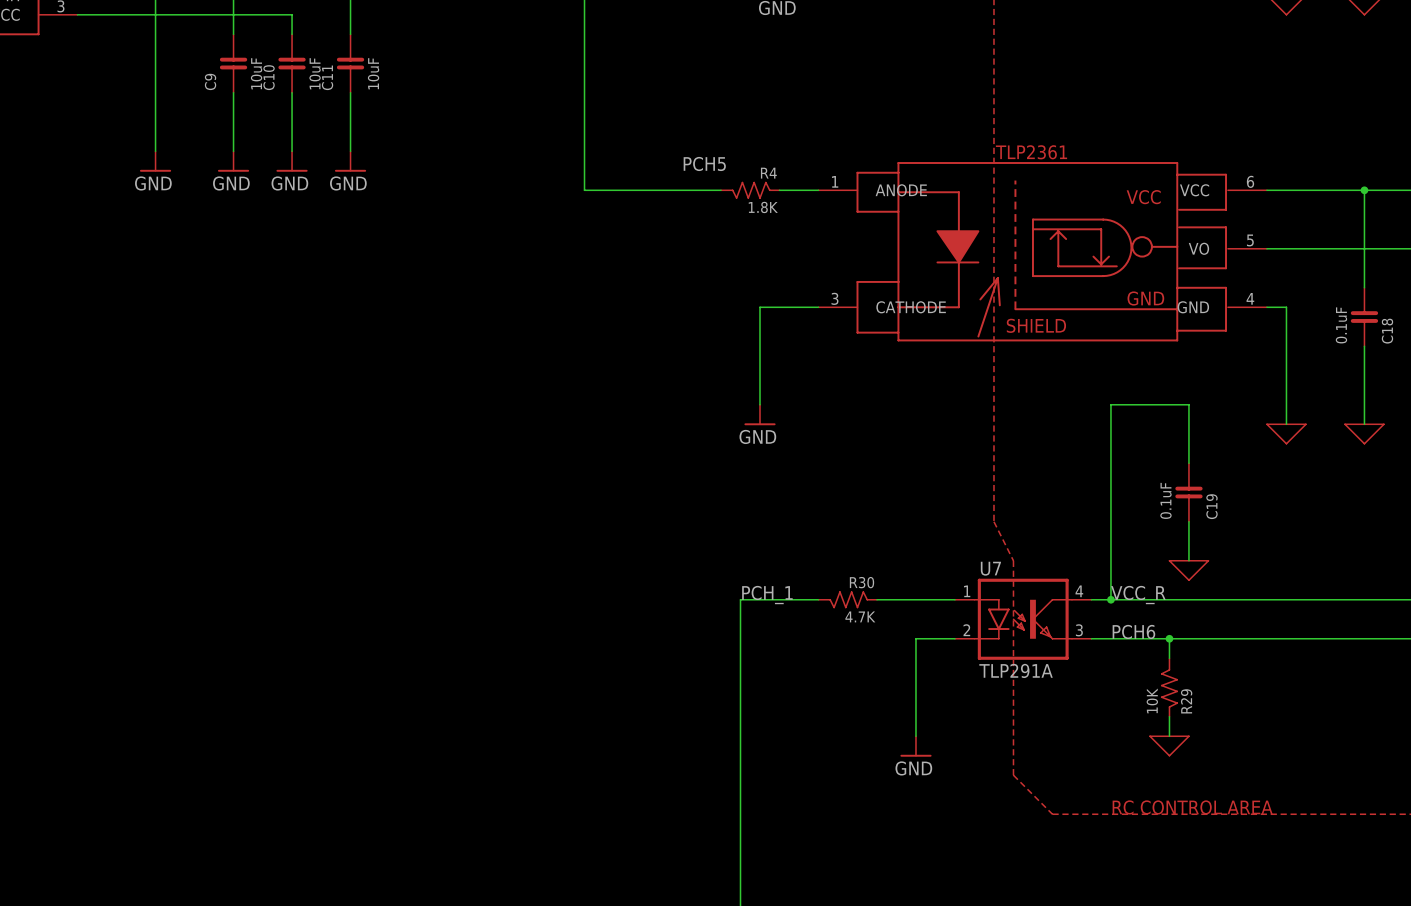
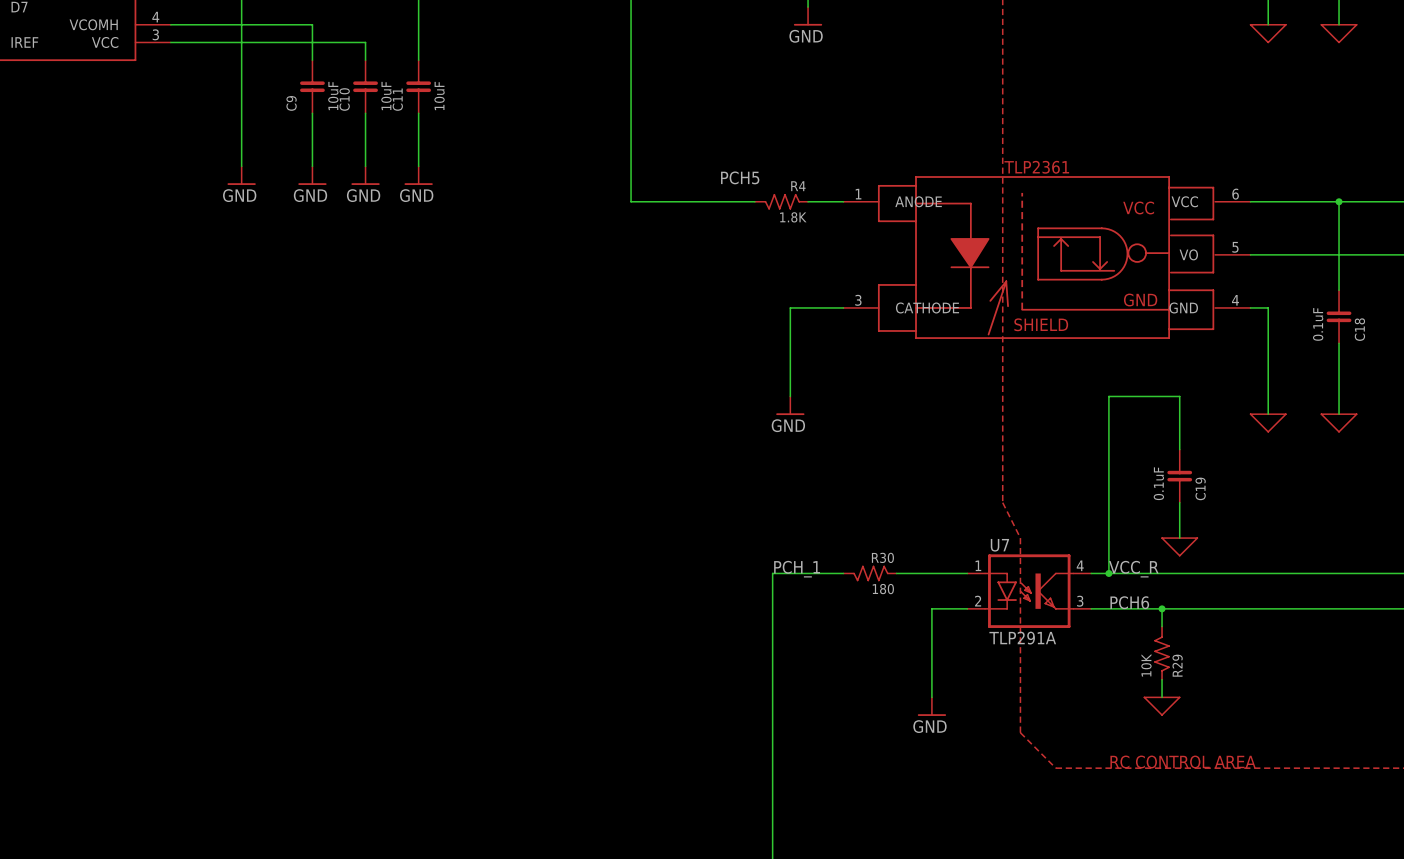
R30 value: 4.7K (860, 616) -> 180 (883, 589)

